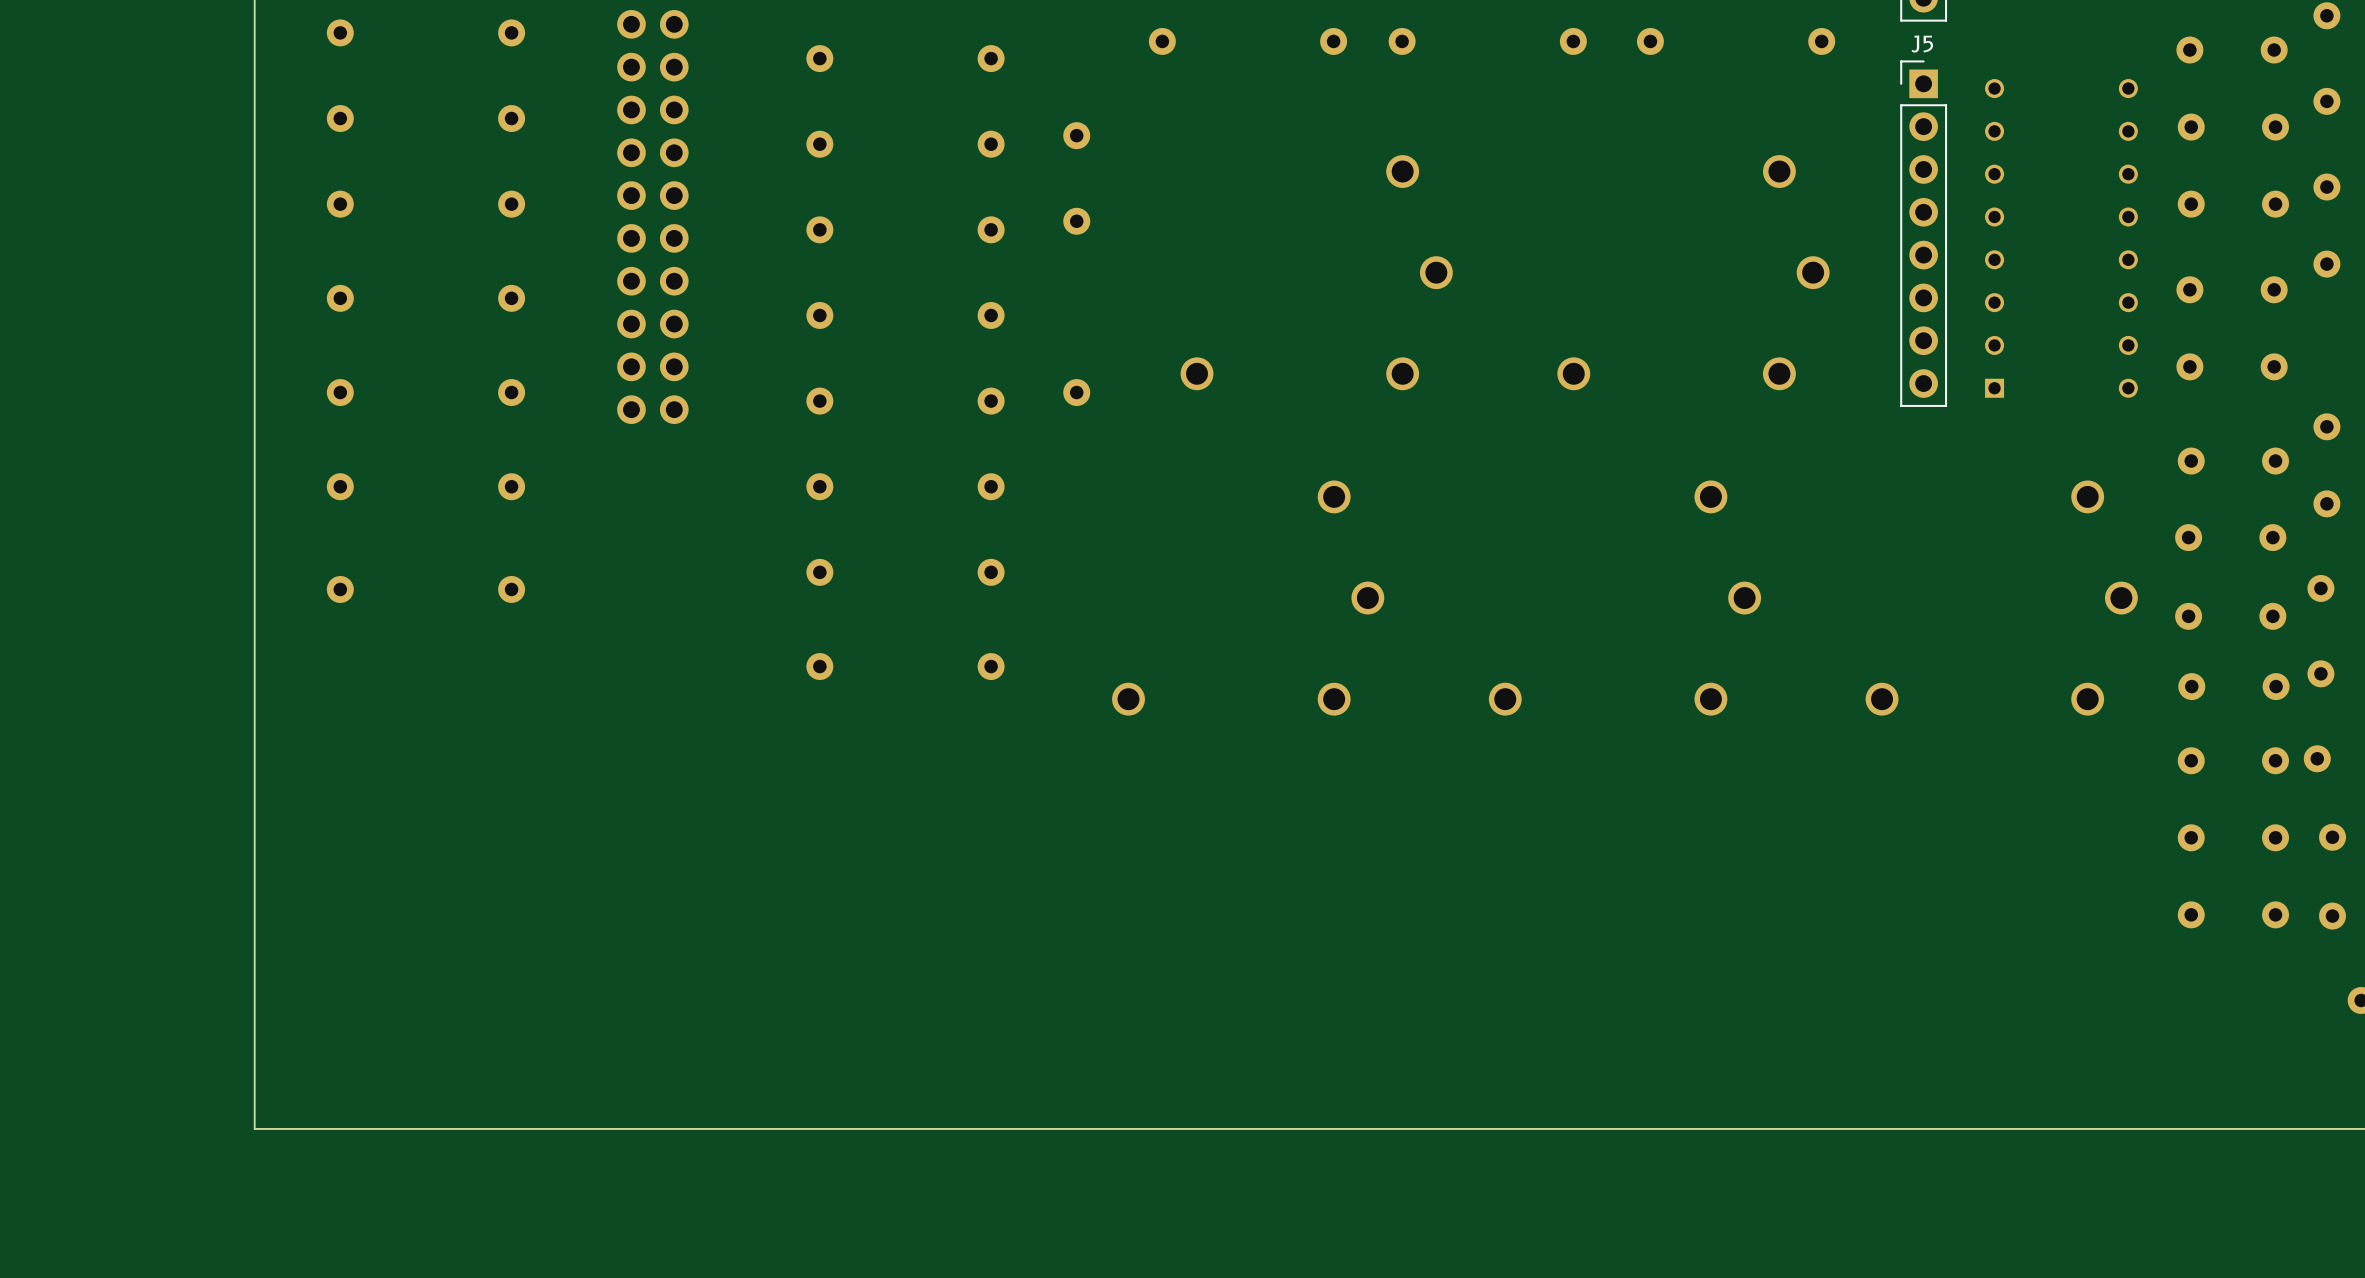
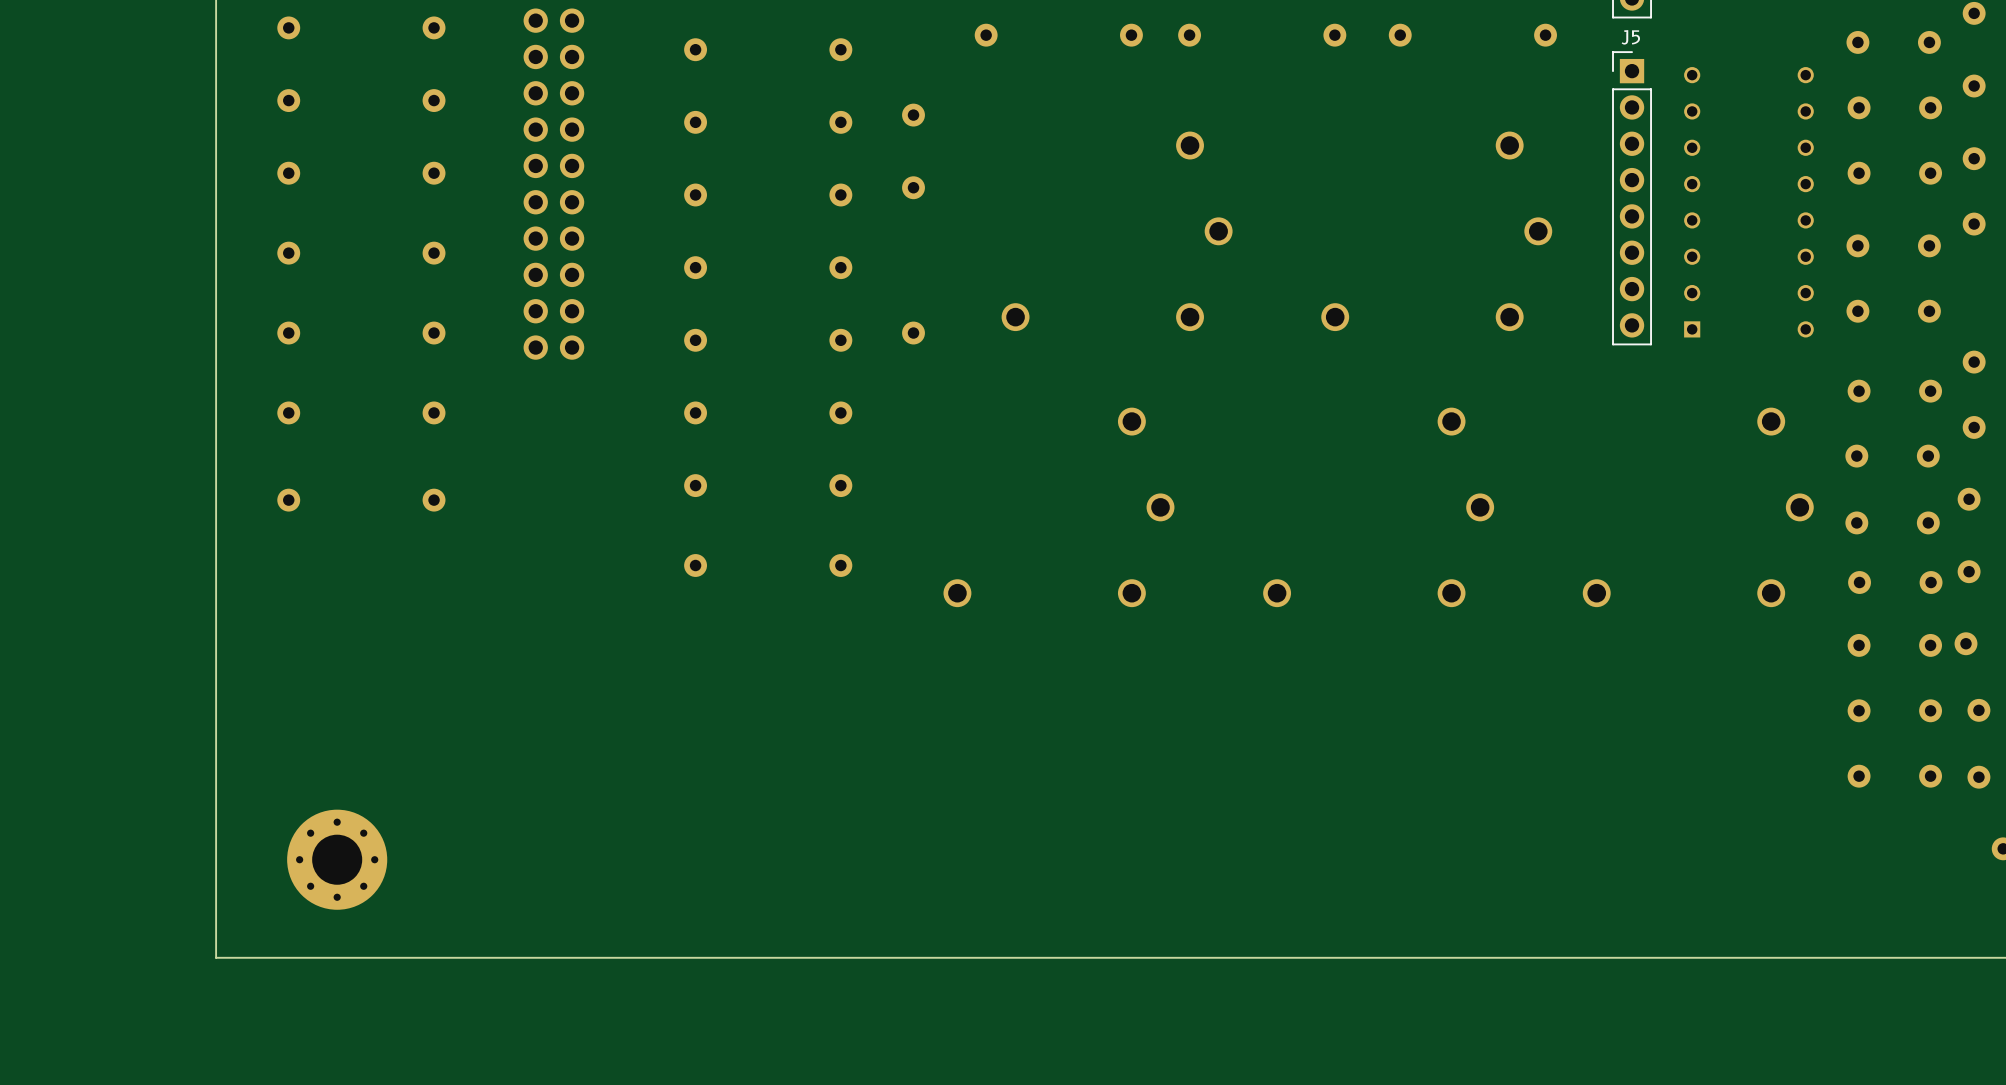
part: none -> (337, 859)

